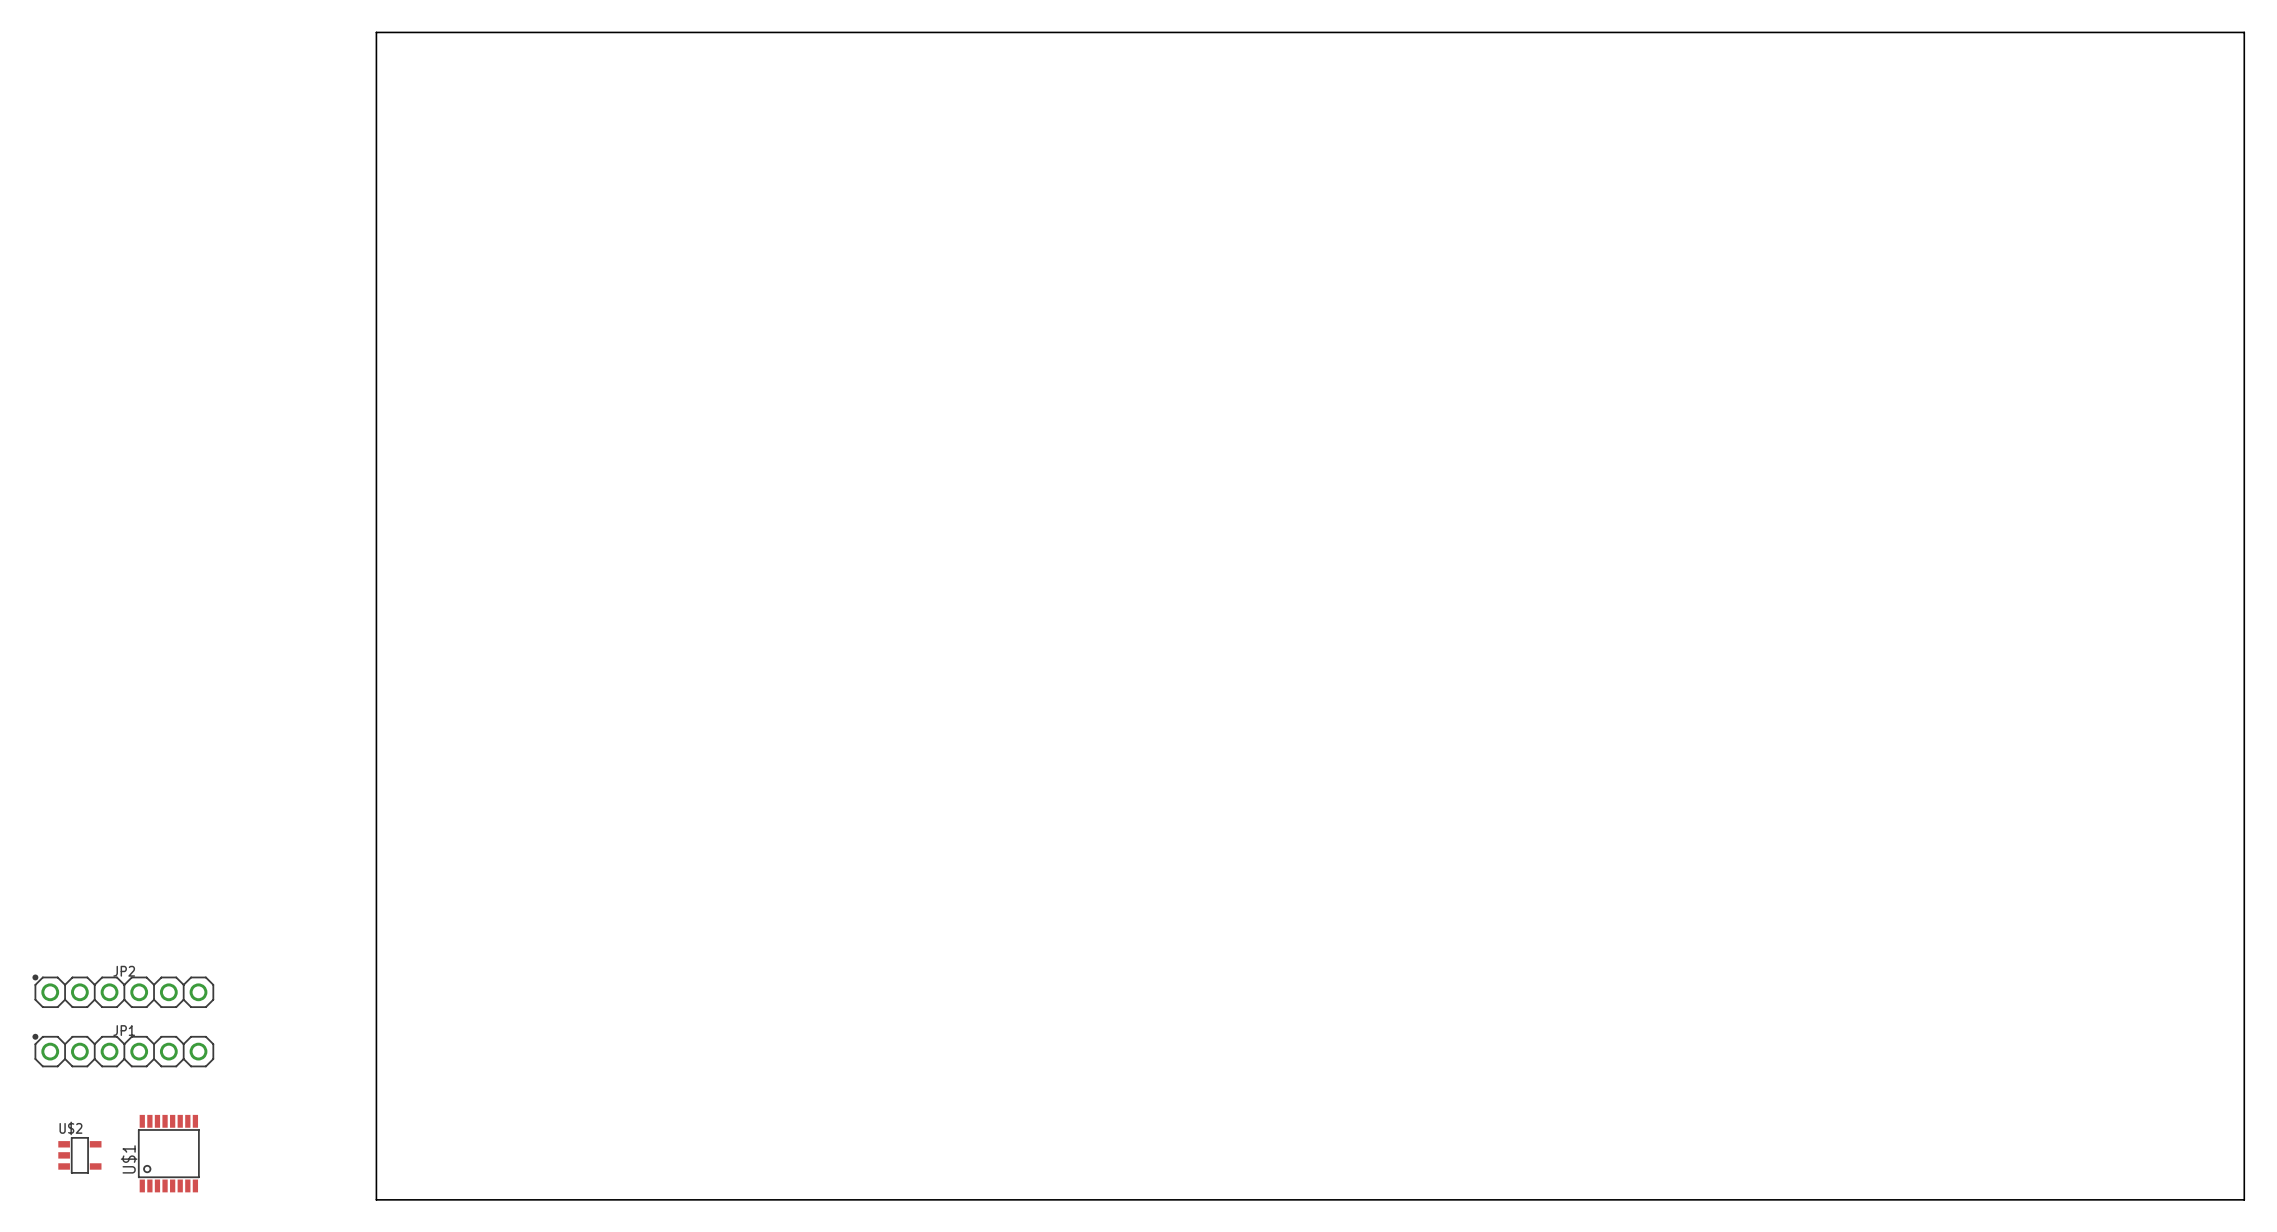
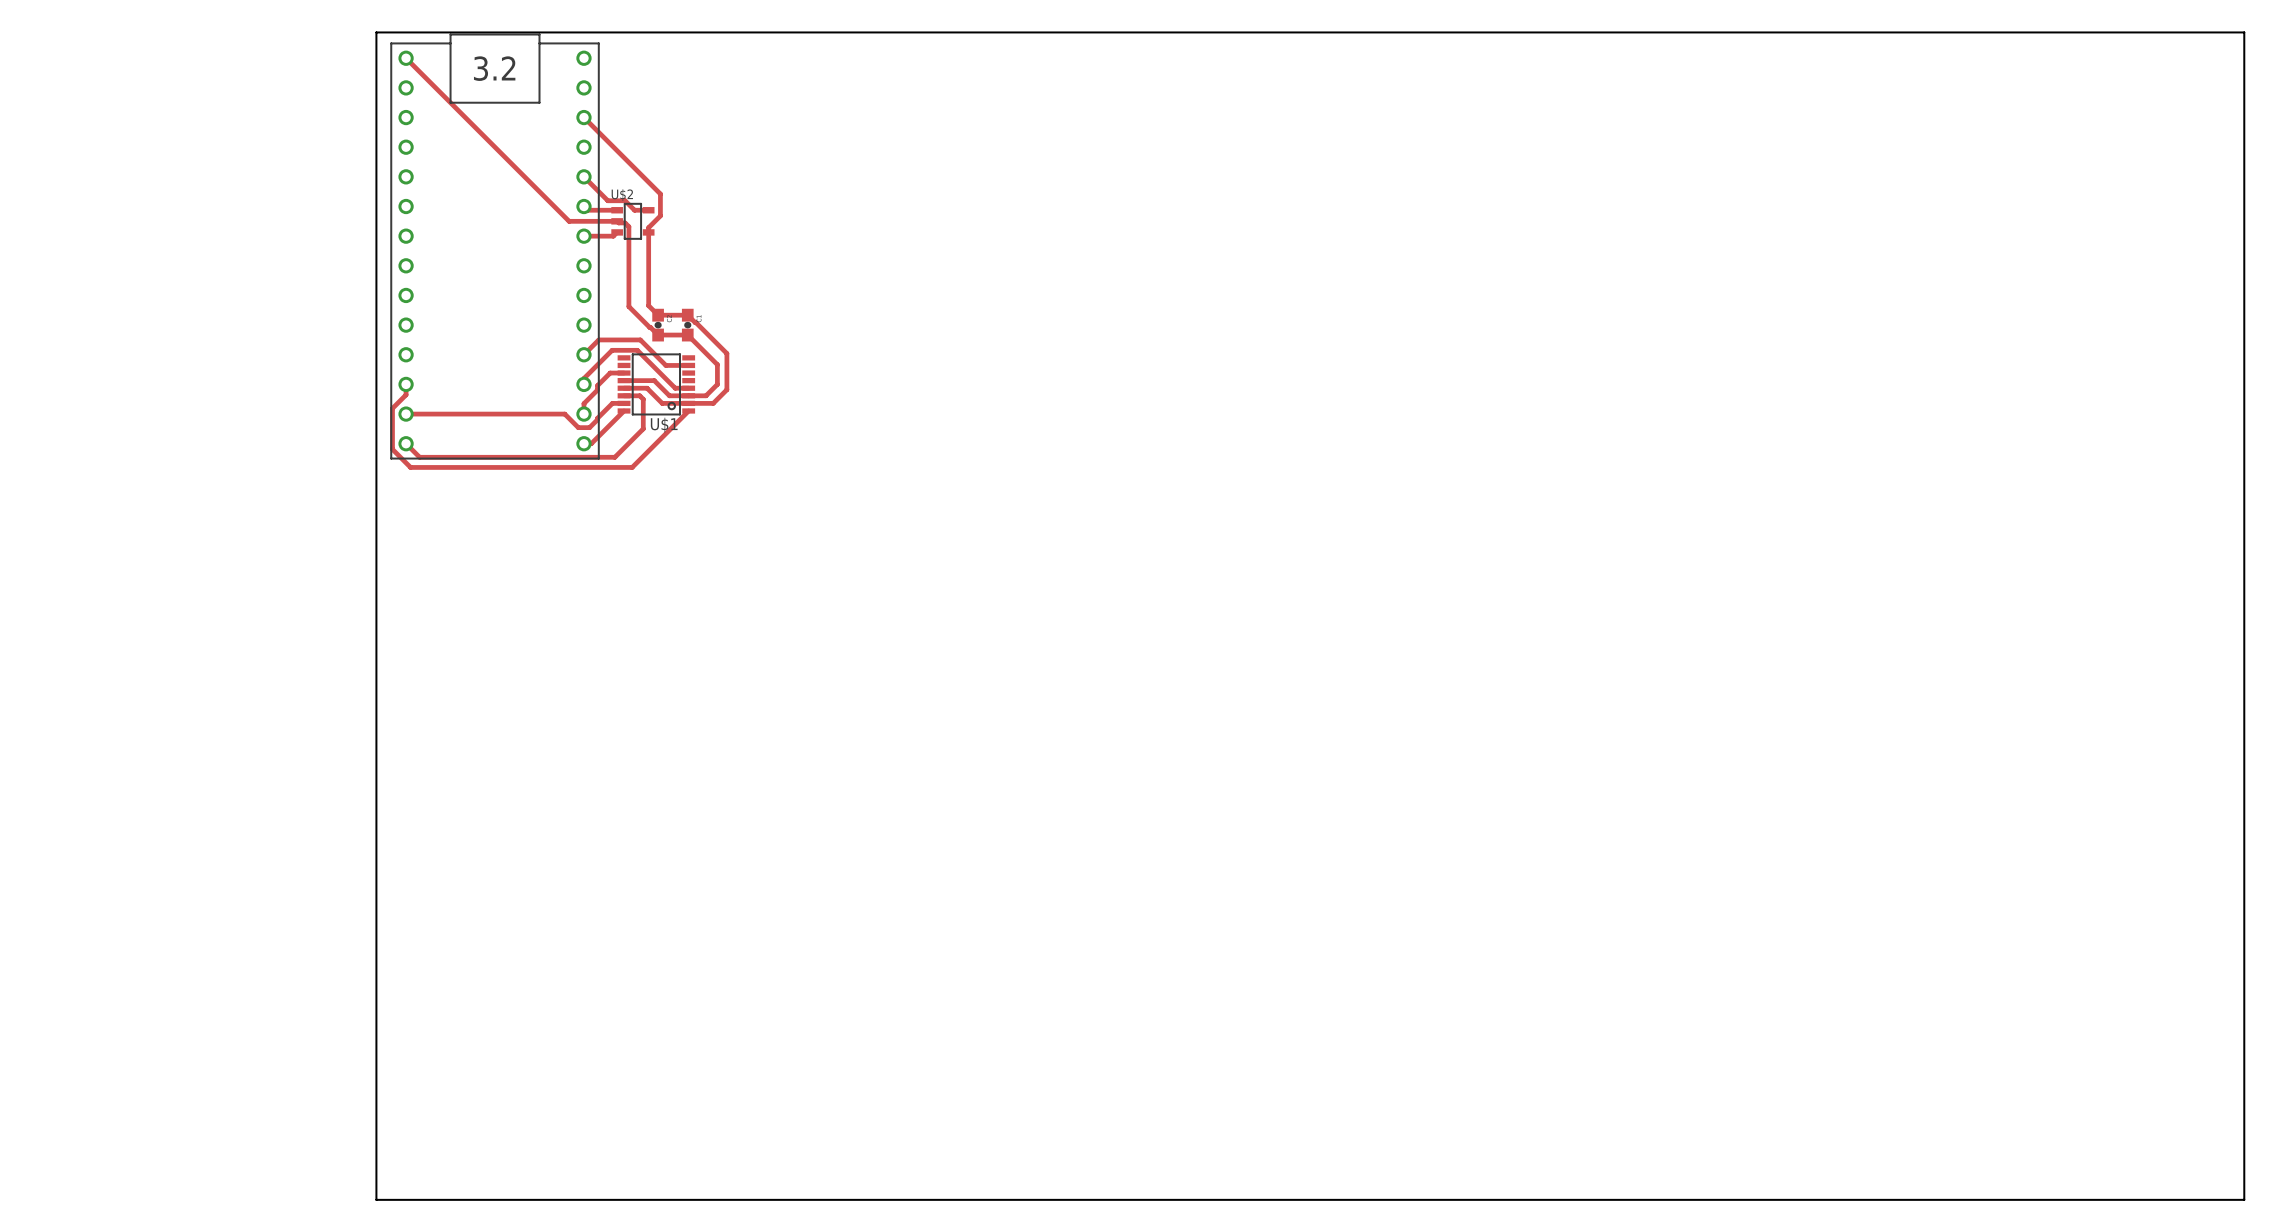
track: none -> (406, 58) (569, 221) (625, 222) (628, 226) (628, 306) (658, 335) (687, 335) (717, 364) (717, 384) (706, 395) (669, 395) (654, 380) (624, 380)
track: none -> (583, 117) (660, 194) (660, 215) (648, 227) (648, 305) (658, 315) (687, 315) (726, 353) (726, 389) (713, 403) (662, 403) (647, 388) (624, 388)
track: none -> (583, 176) (607, 200) (625, 200) (634, 210) (648, 210)
track: none -> (583, 206) (587, 210) (617, 210)
track: none -> (617, 232) (613, 236) (583, 236)
part: none -> (495, 246)
part: none -> (658, 325)
part: none -> (687, 325)
track: none -> (583, 354) (598, 339) (640, 339) (665, 365) (688, 365)
track: none -> (624, 373) (610, 373) (597, 385) (597, 390) (583, 403) (583, 414)
track: none -> (406, 384) (406, 394) (392, 408) (392, 449) (410, 467) (632, 467) (688, 410)
track: none -> (583, 384) (583, 378) (612, 350) (637, 350) (675, 388) (688, 388)
track: none -> (624, 395) (639, 395) (643, 399) (643, 428) (614, 457) (419, 457) (406, 443)
track: none -> (624, 403) (612, 403) (589, 427) (578, 427) (564, 414) (406, 414)
track: none -> (624, 410) (591, 443) (583, 443)
JP2: (123, 991) -> none
JP1: (123, 1050) -> none
U$1 rotation: 0° (168, 1153) -> 90° counterclockwise (656, 384)
U$1 position: (168, 1153) -> (656, 384)
U$2 position: (79, 1155) -> (632, 221)

